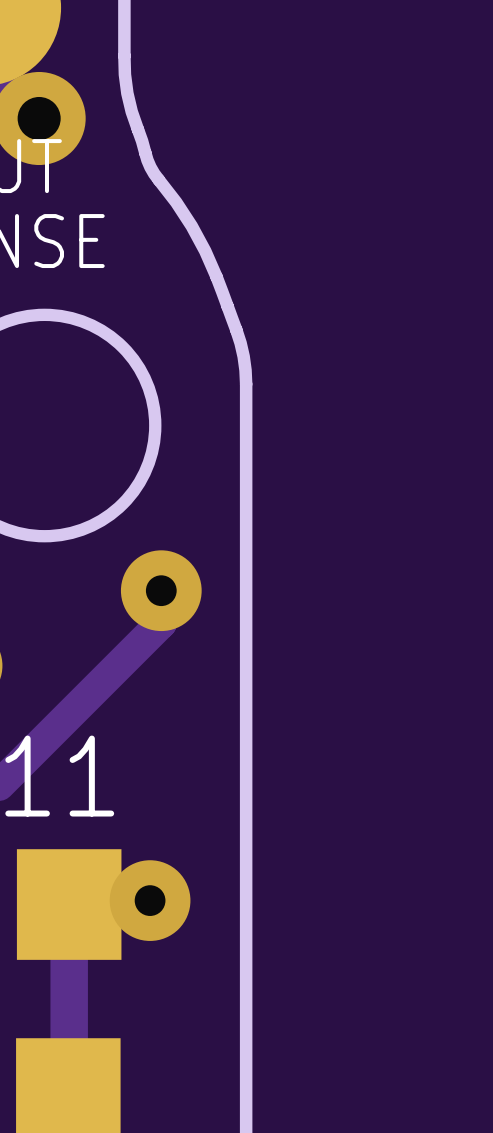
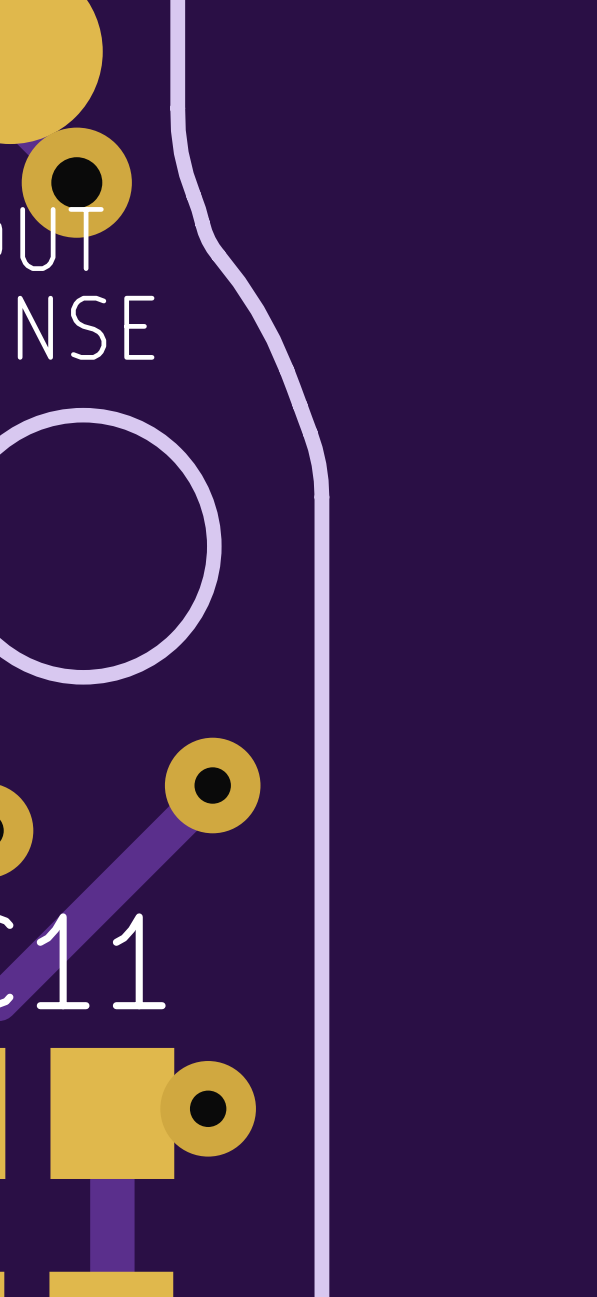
via position: (161, 590) -> (212, 785)

